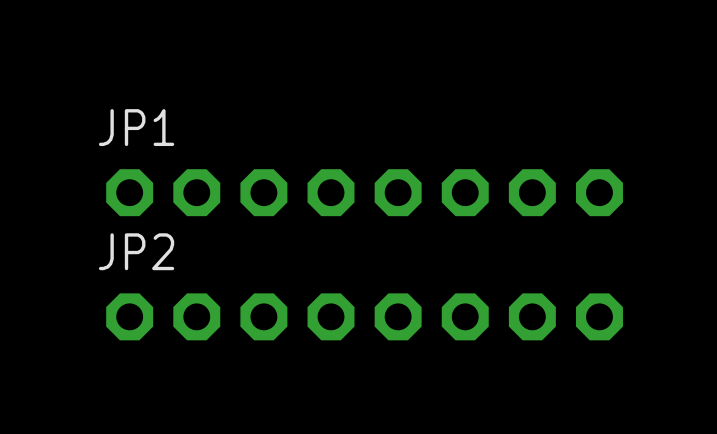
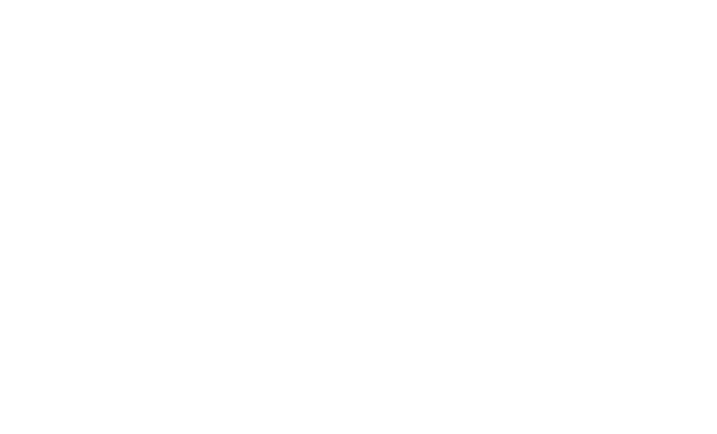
JP1: (364, 192) -> none
JP2: (364, 316) -> none

